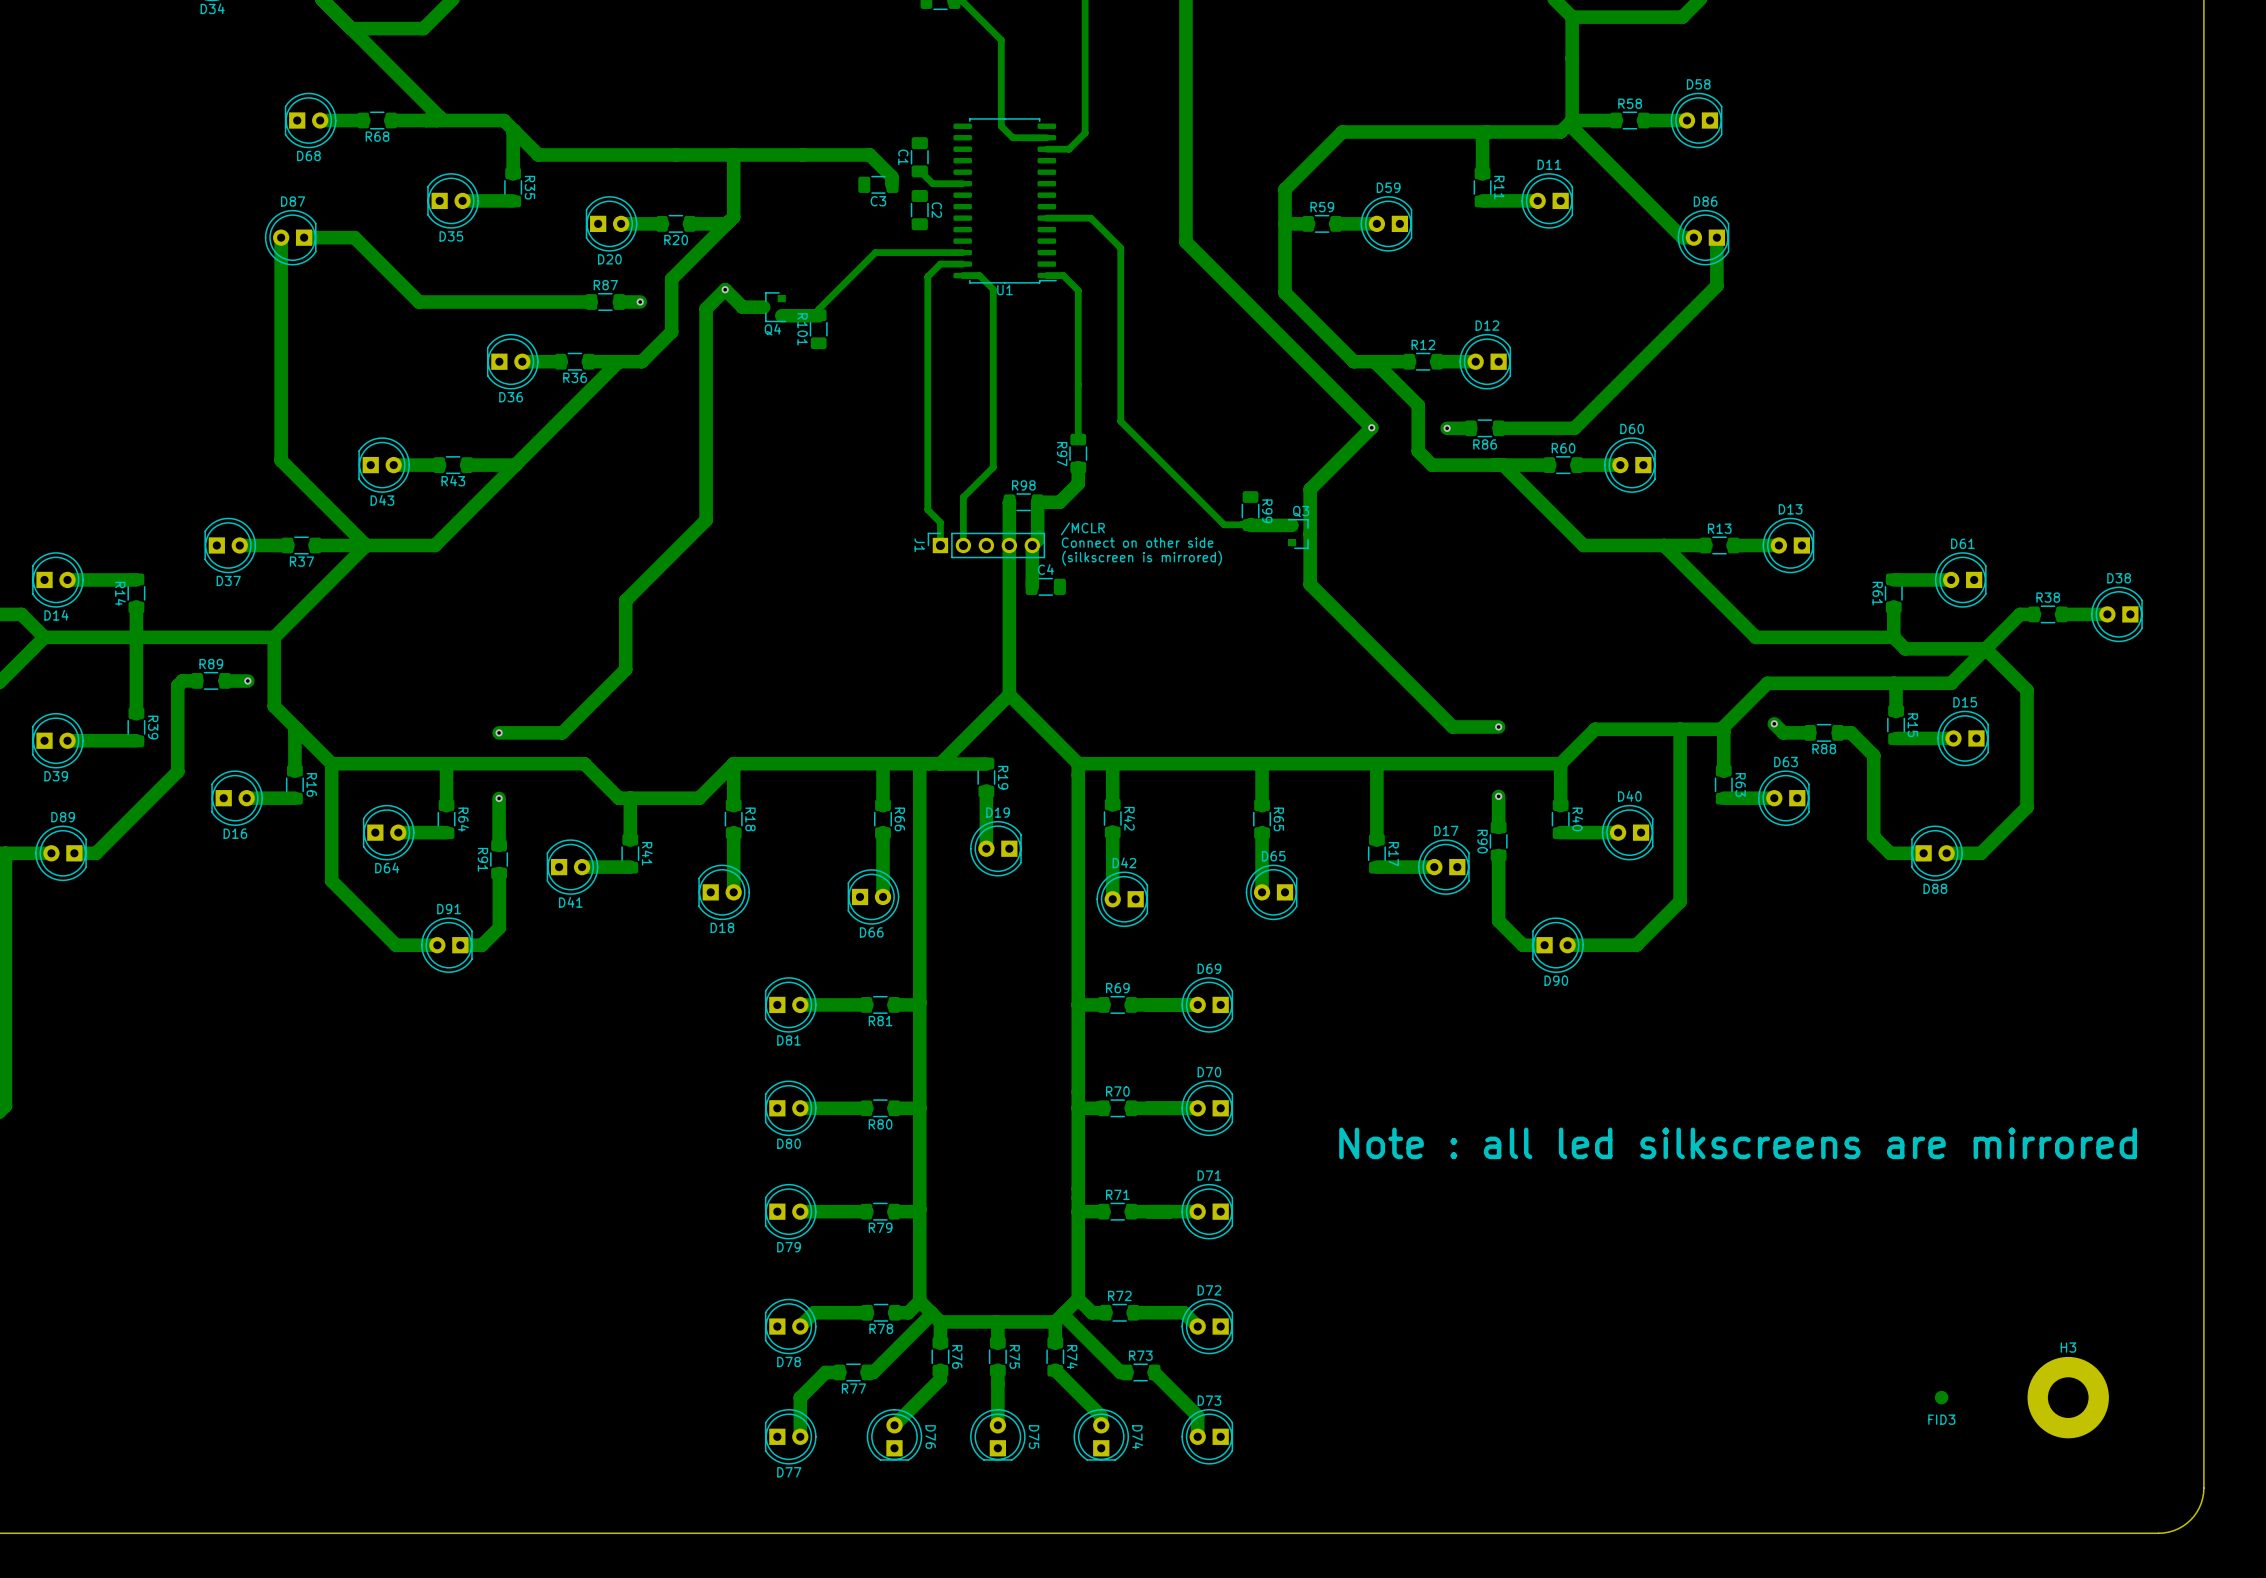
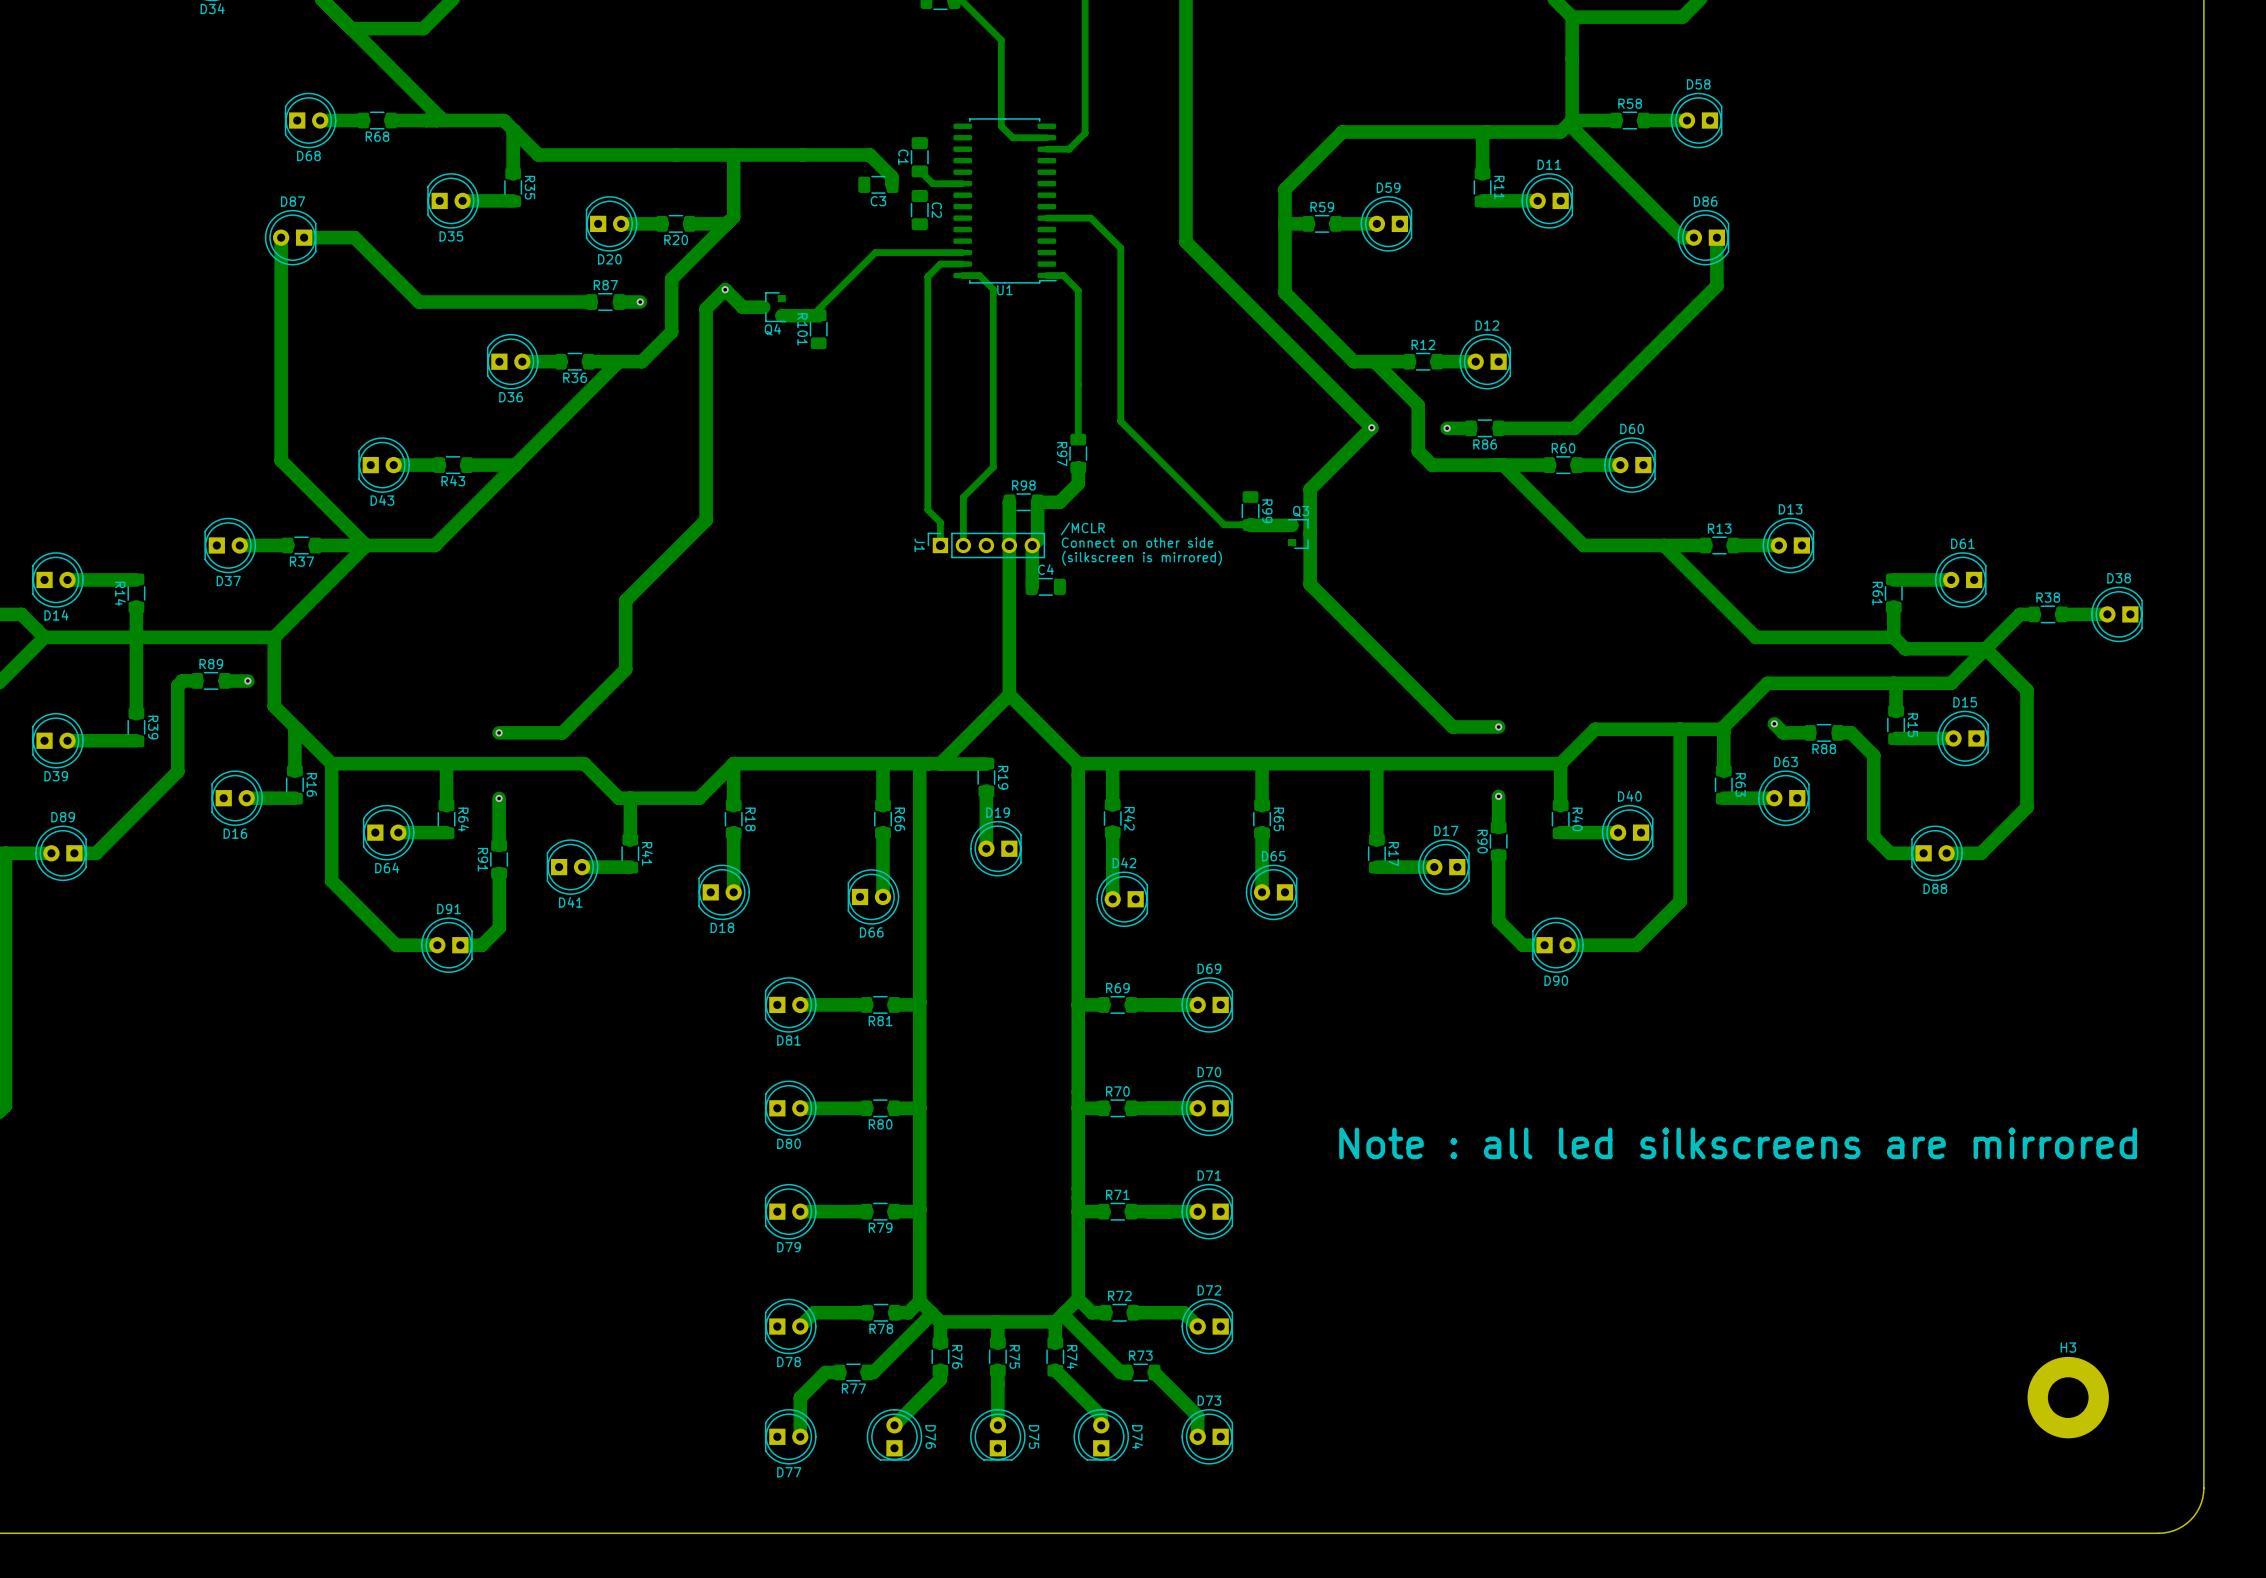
FID3: (1941, 1397) -> none

